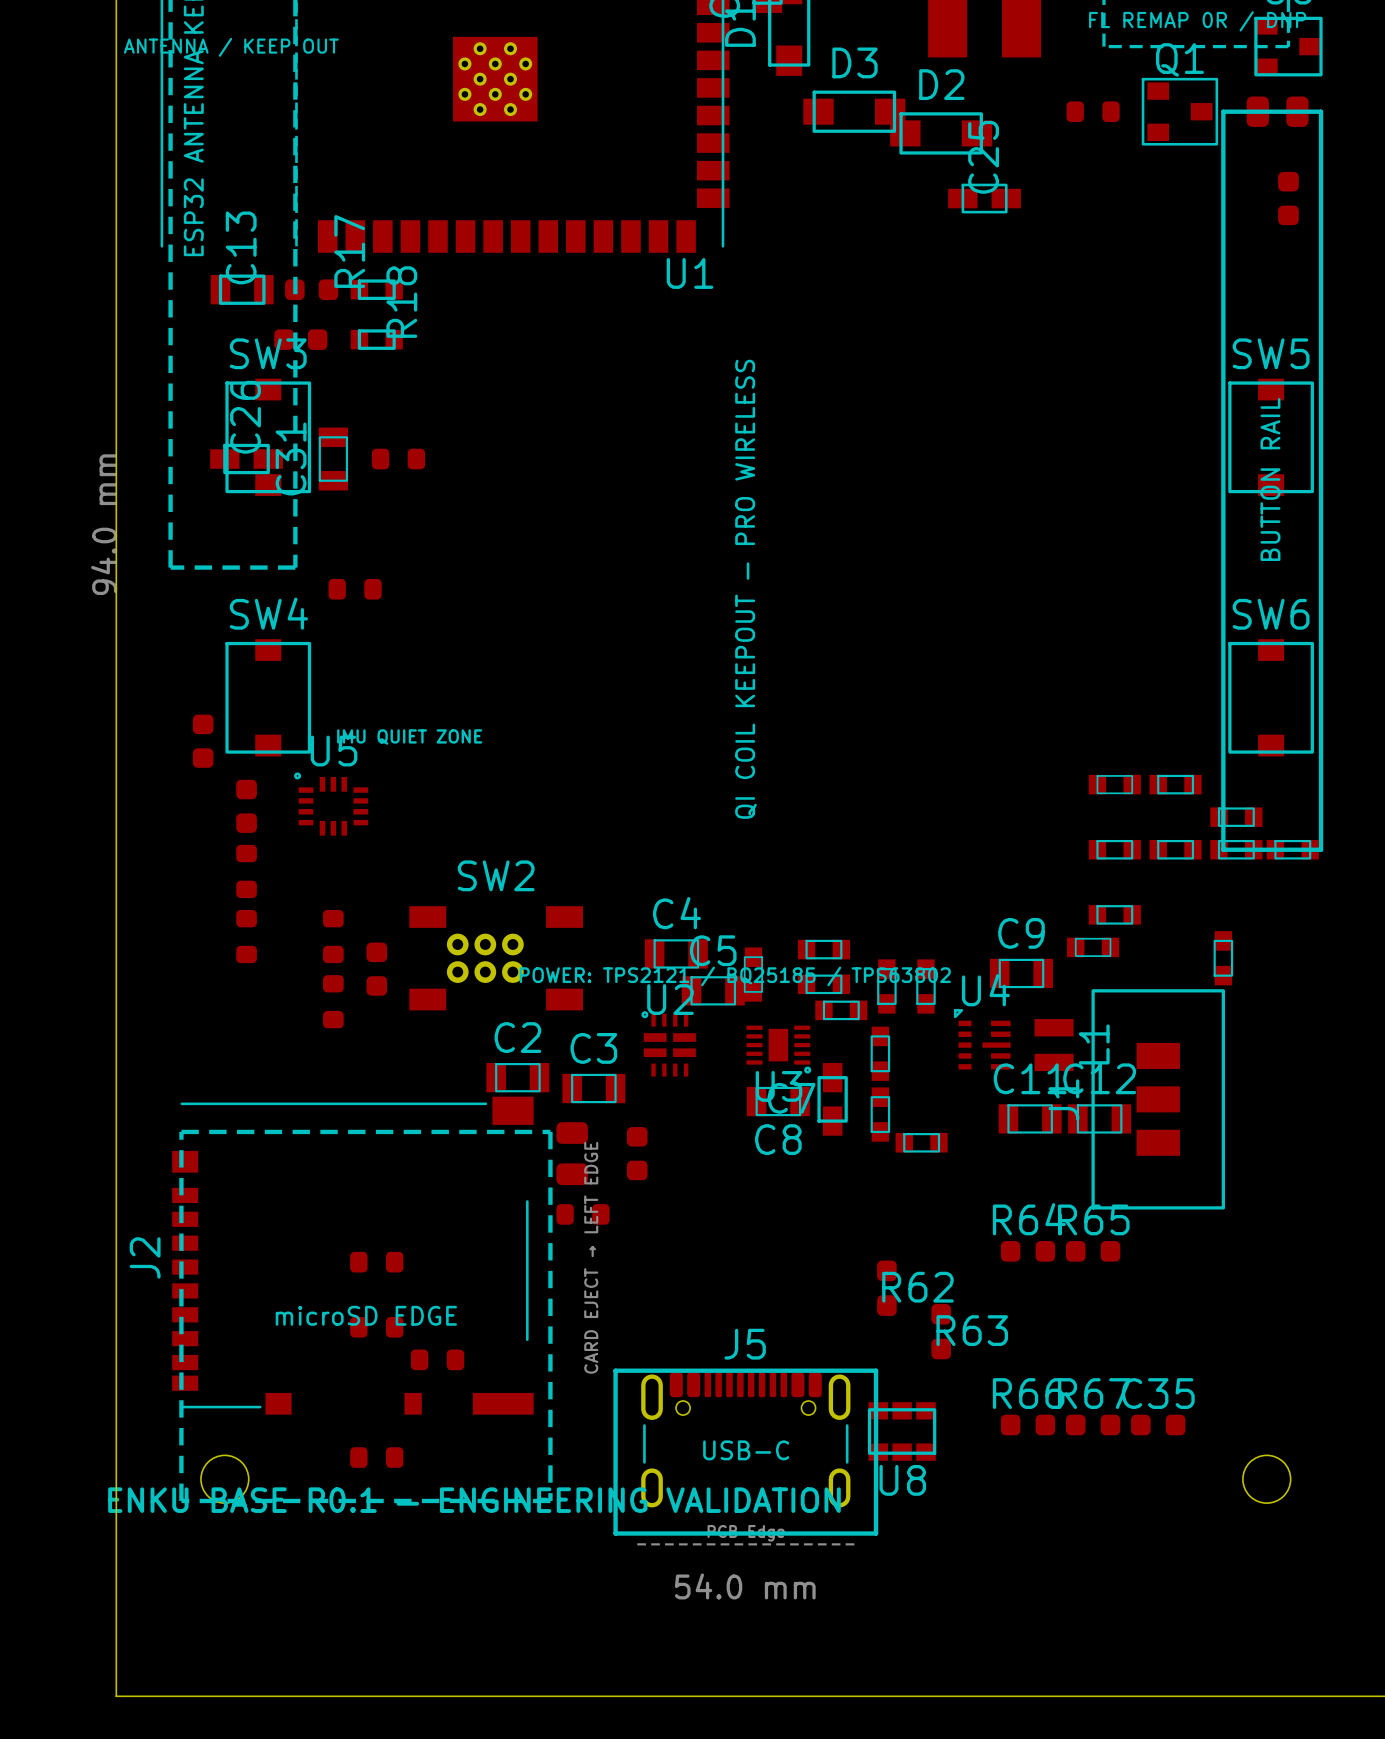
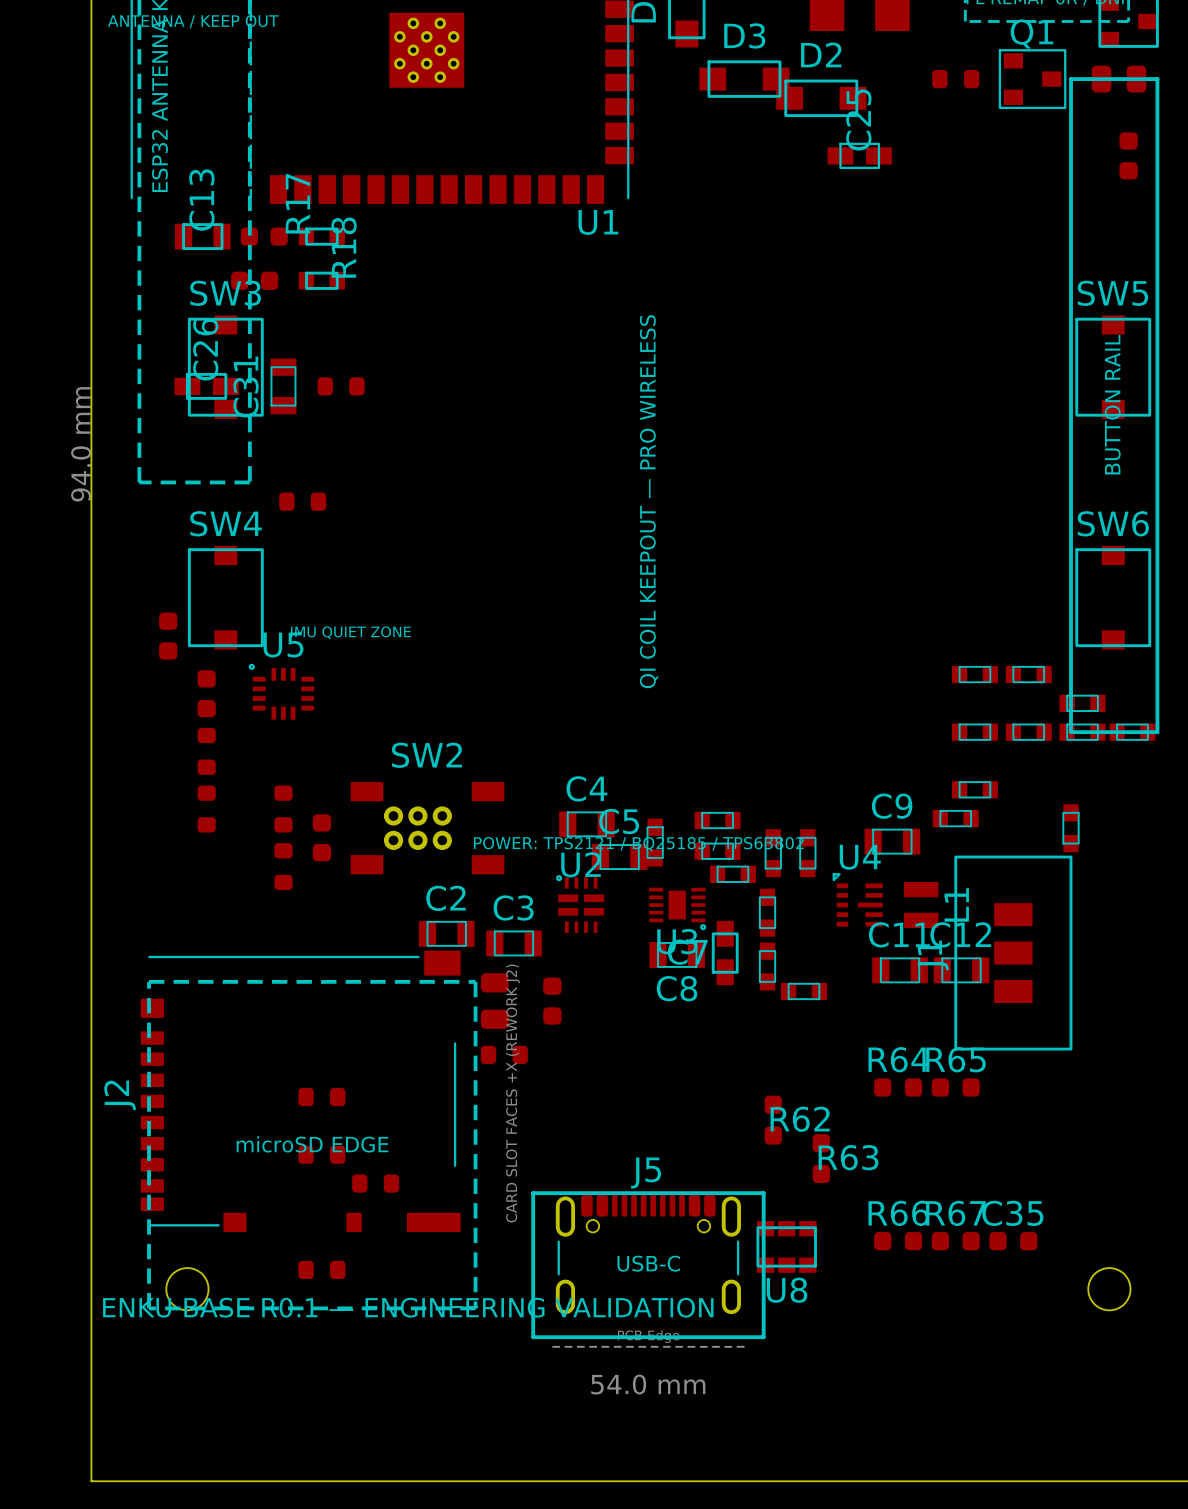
J2 text: CARD EJECT → LEFT EDGE (591, 1257) -> CARD SLOT FACES +X (REWORK J2) (512, 1093)

